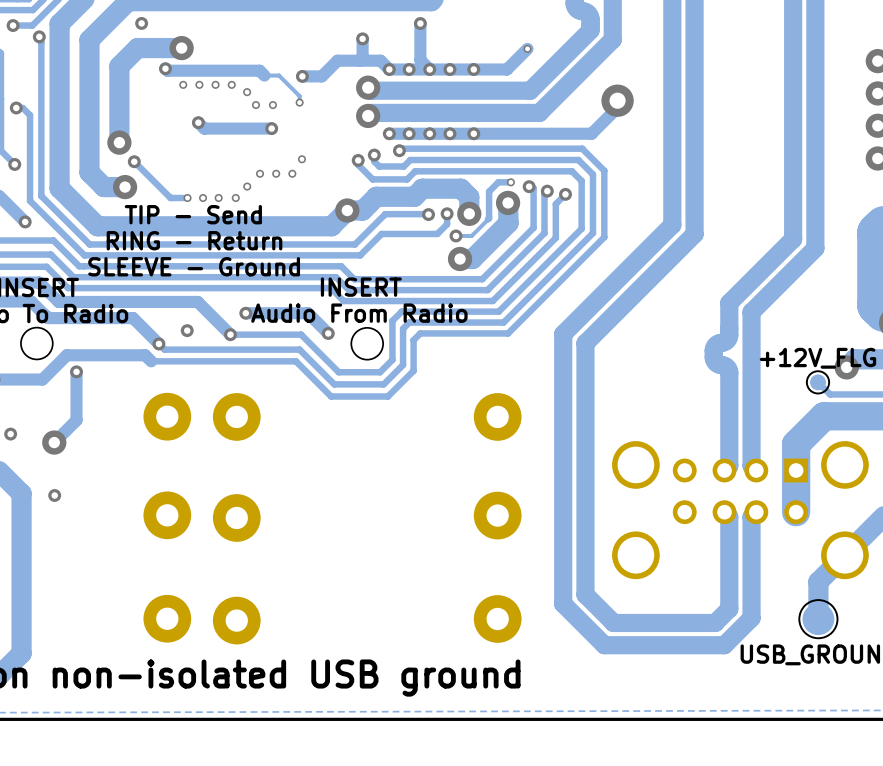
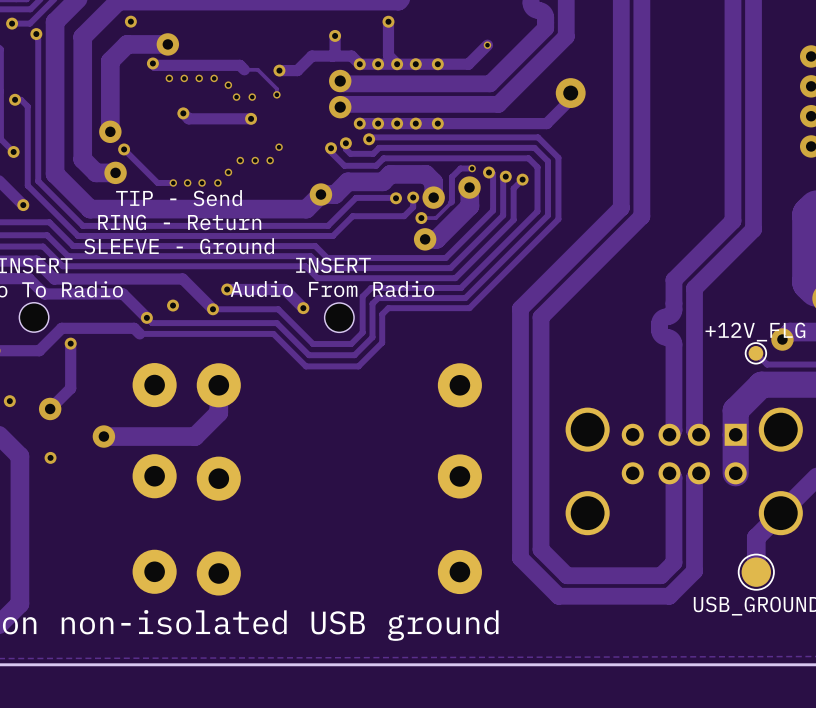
track: none -> (218, 385) (218, 412) (195, 436) (103, 436)
via: none -> (103, 436)

